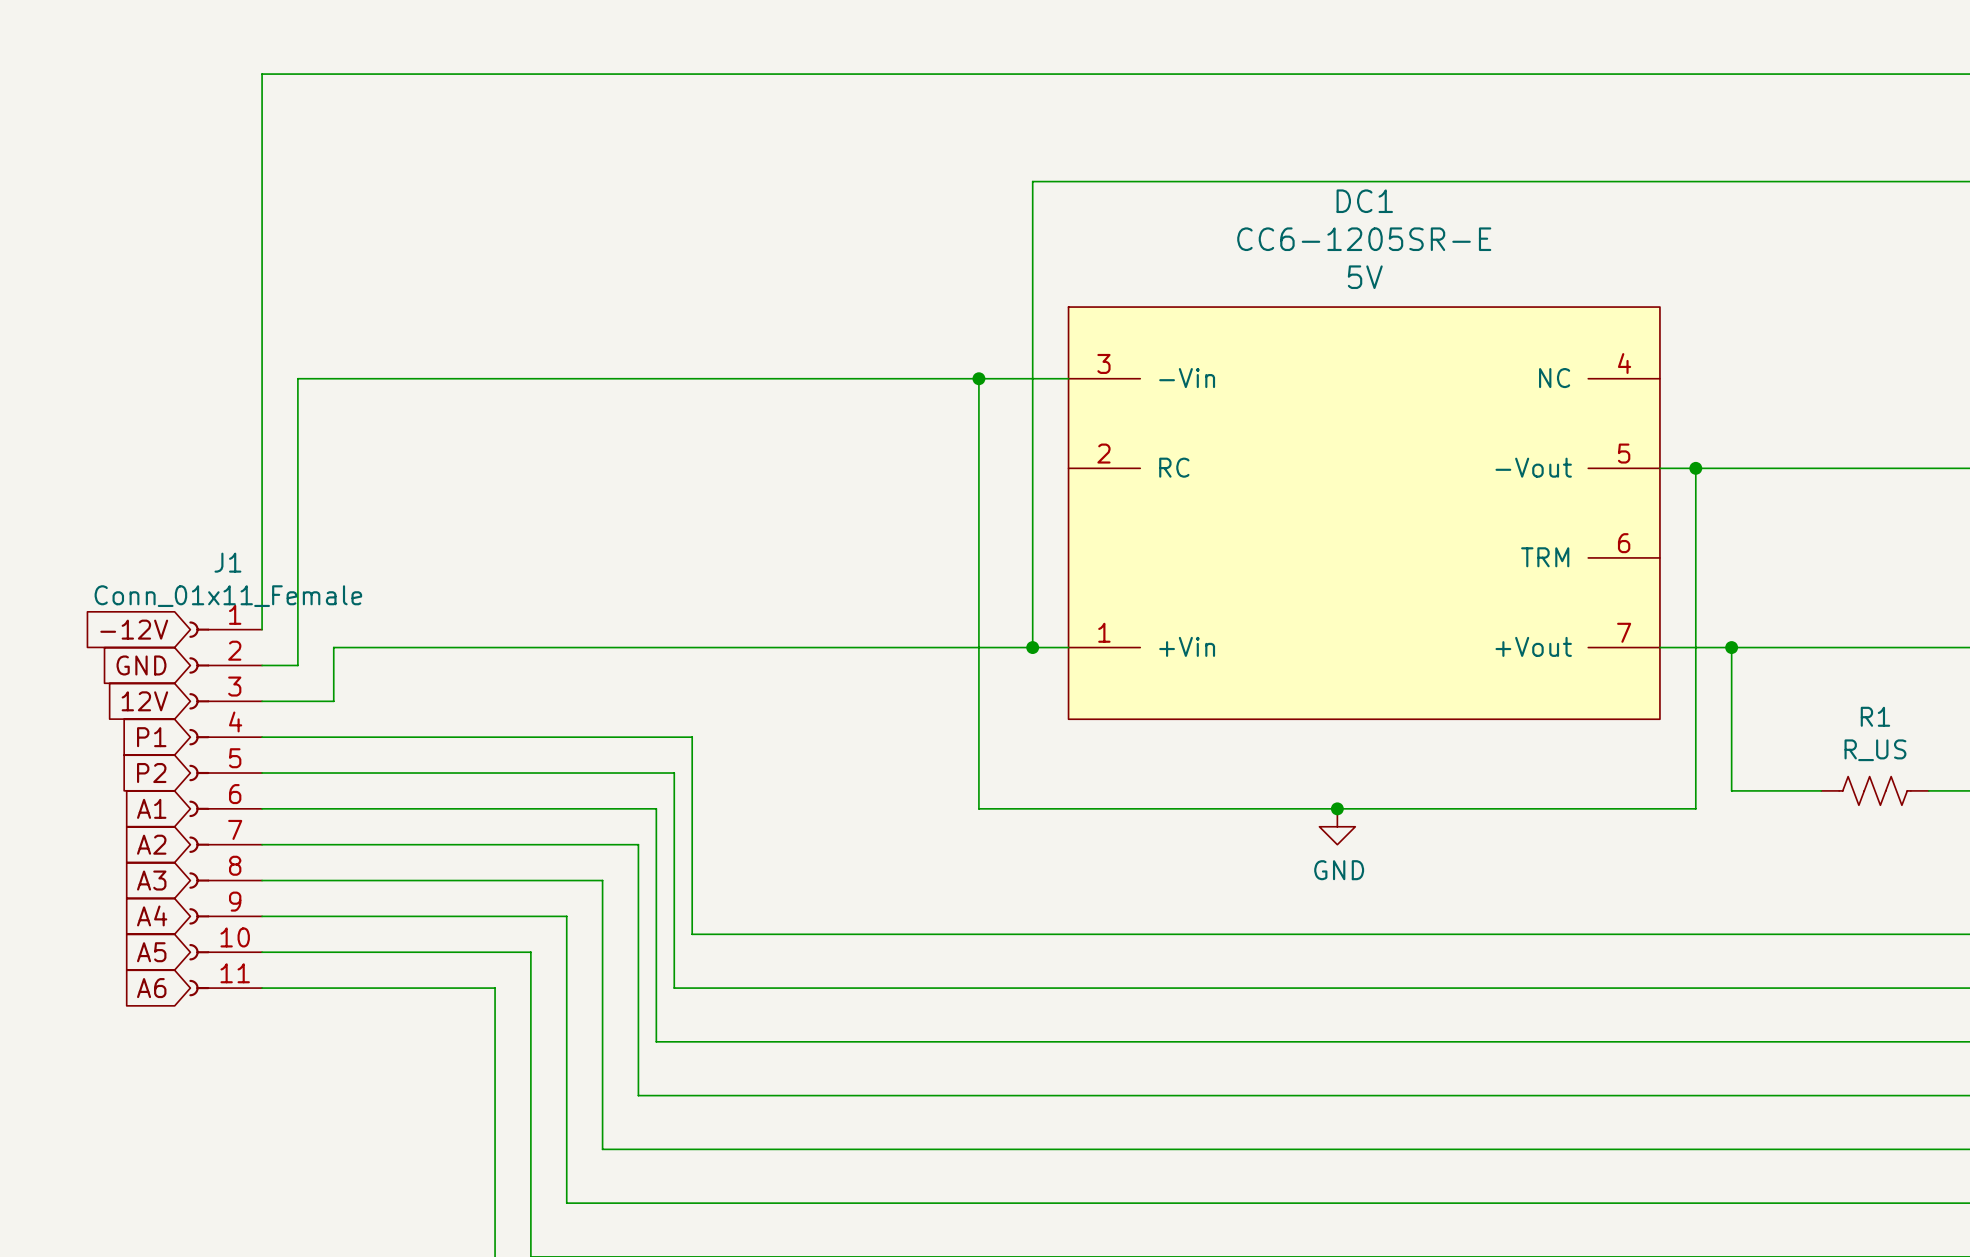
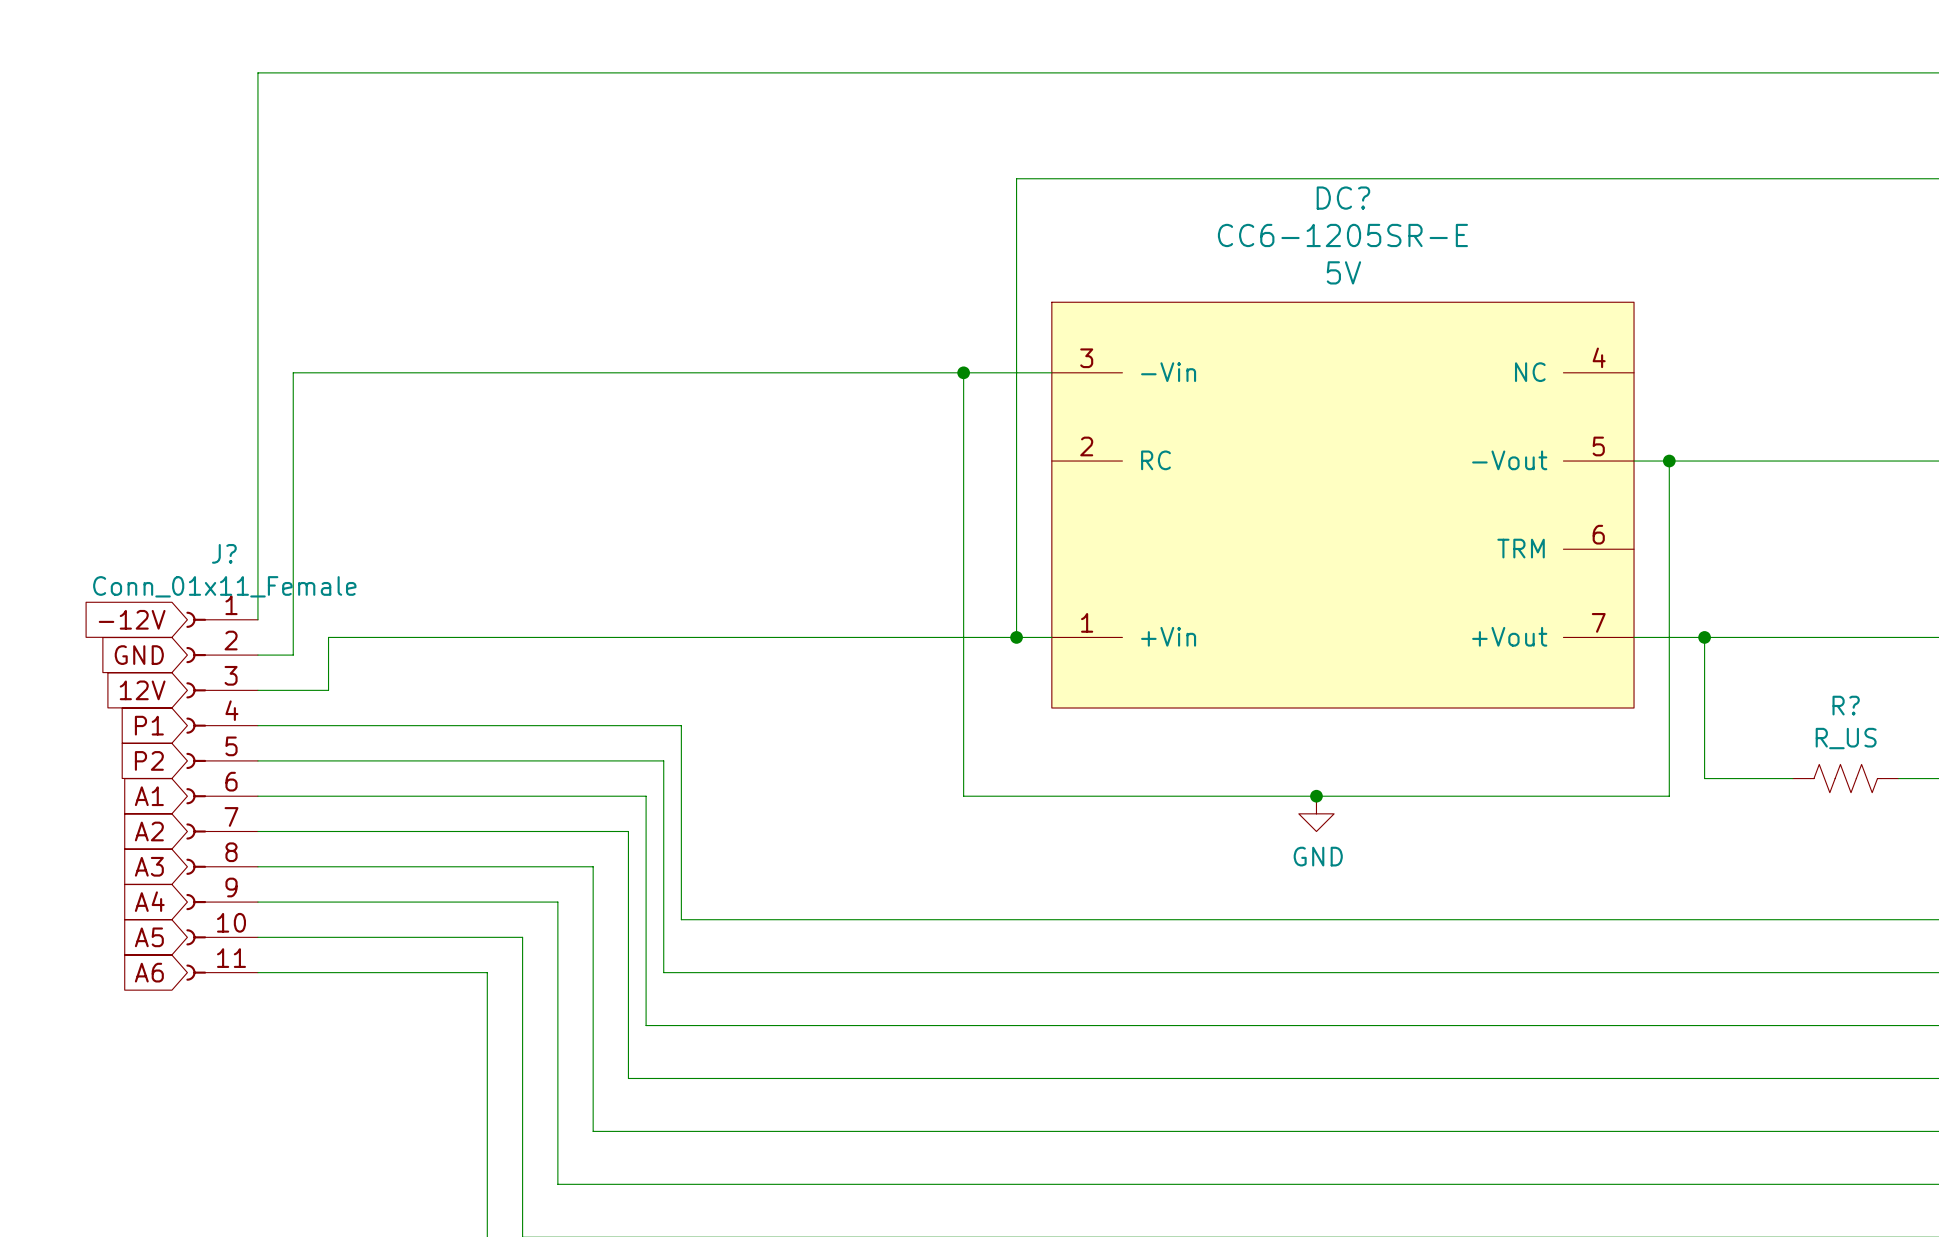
DC1 name: DC1 (1364, 201) -> DC? (1343, 198)
J1 name: J1 (227, 562) -> J? (224, 553)
R1 name: R1 (1875, 716) -> R? (1846, 705)

